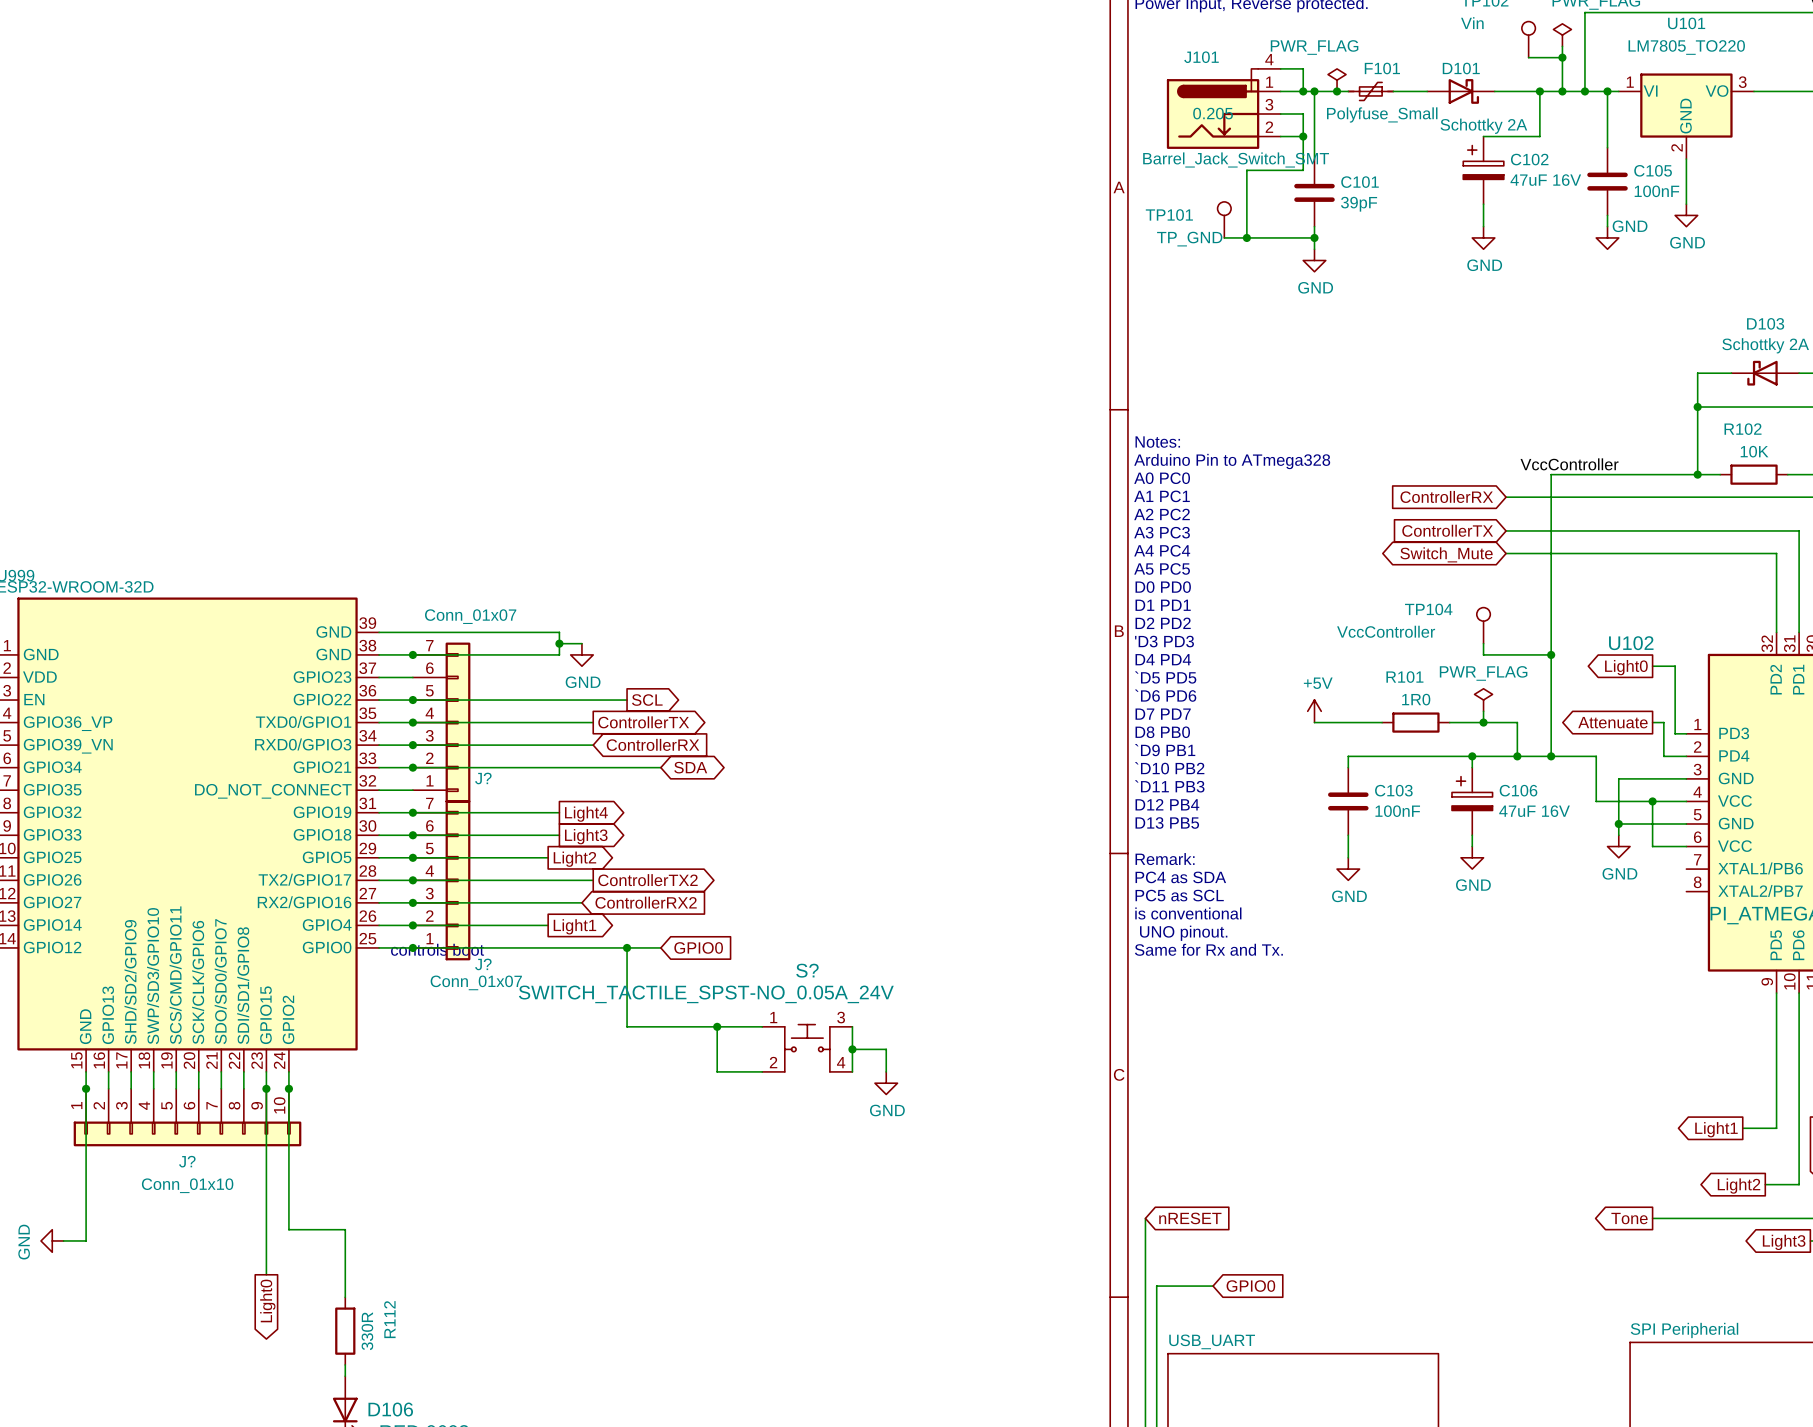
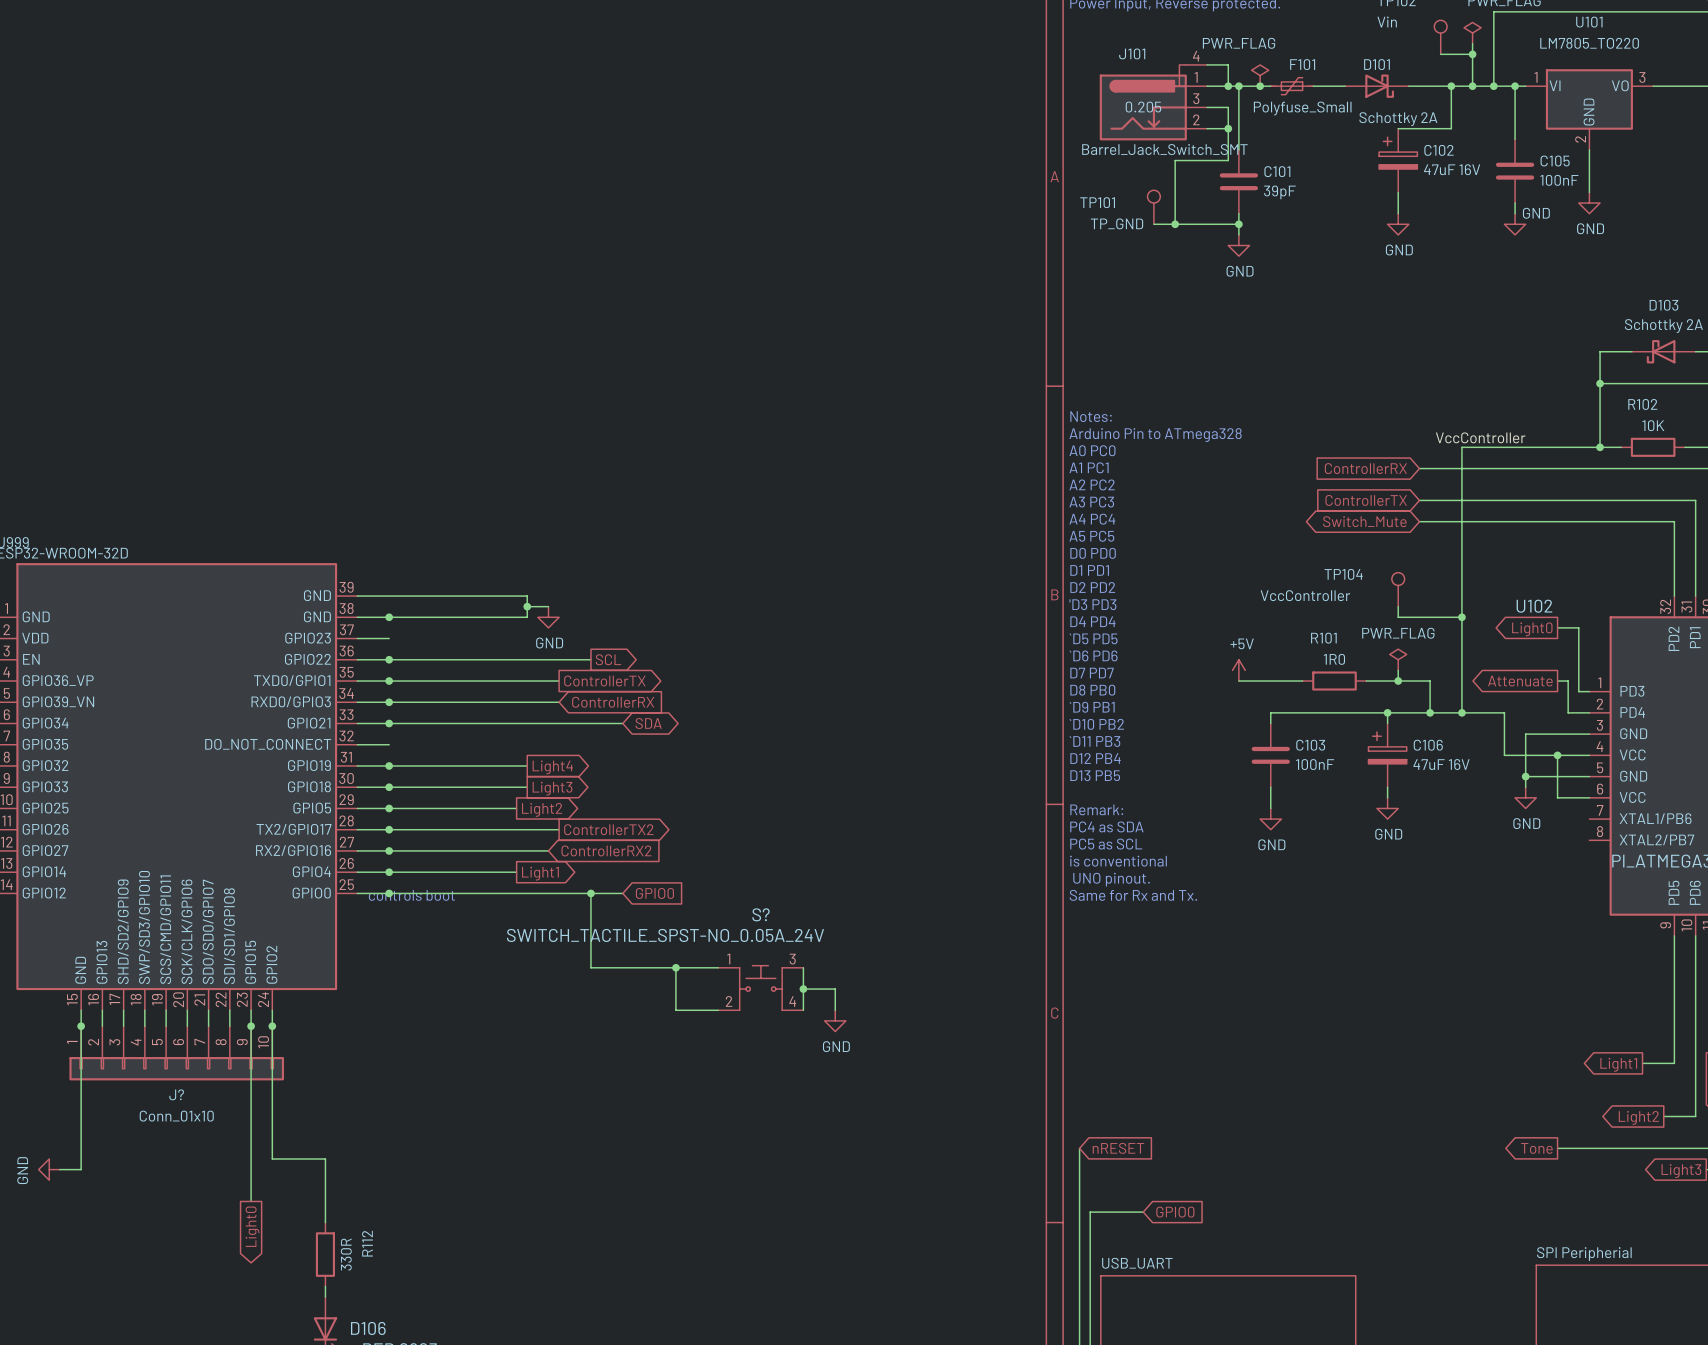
J?: Conn_01x07 (441, 722) -> none
J?: Conn_01x07 (441, 880) -> none

